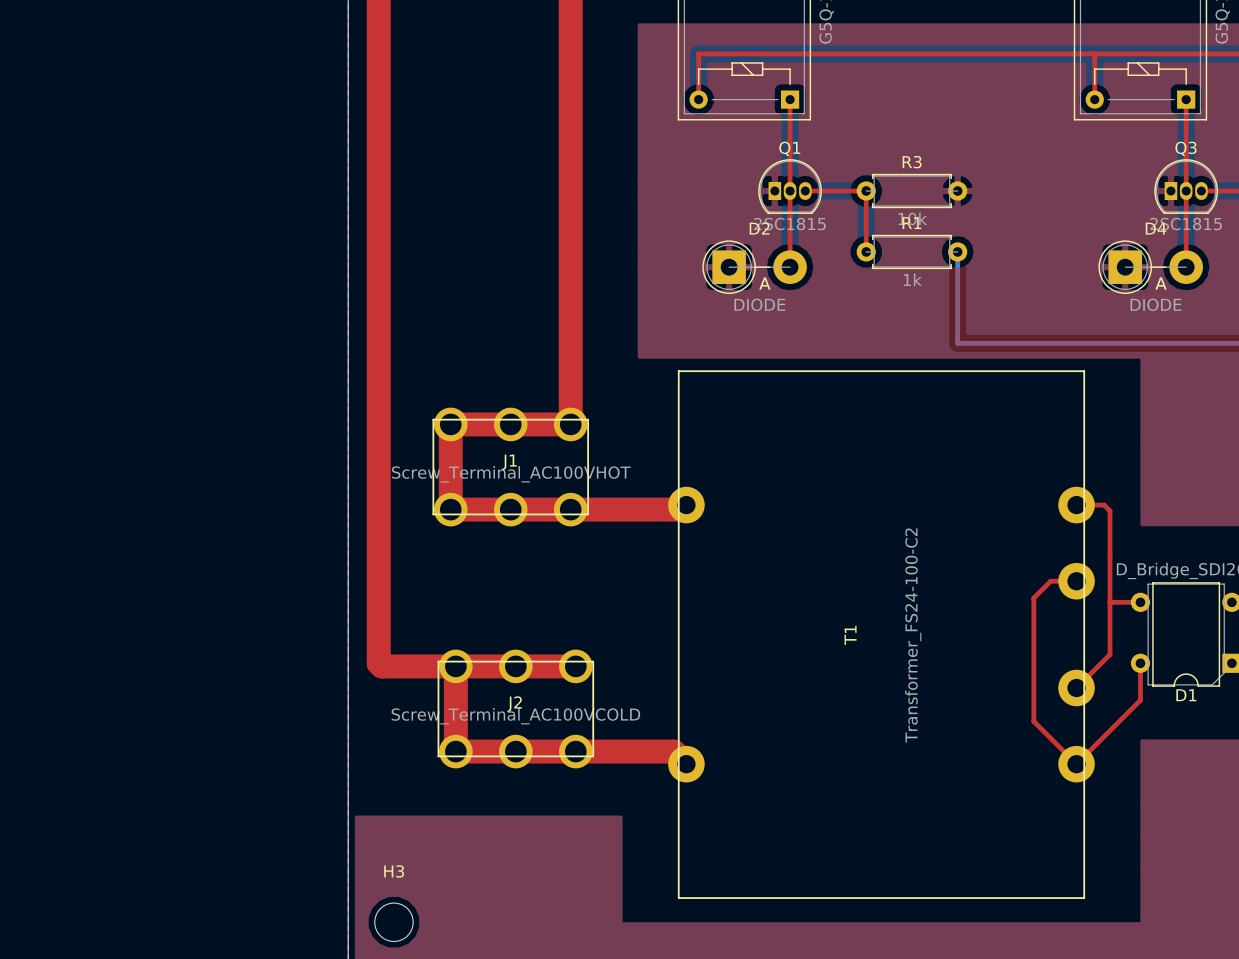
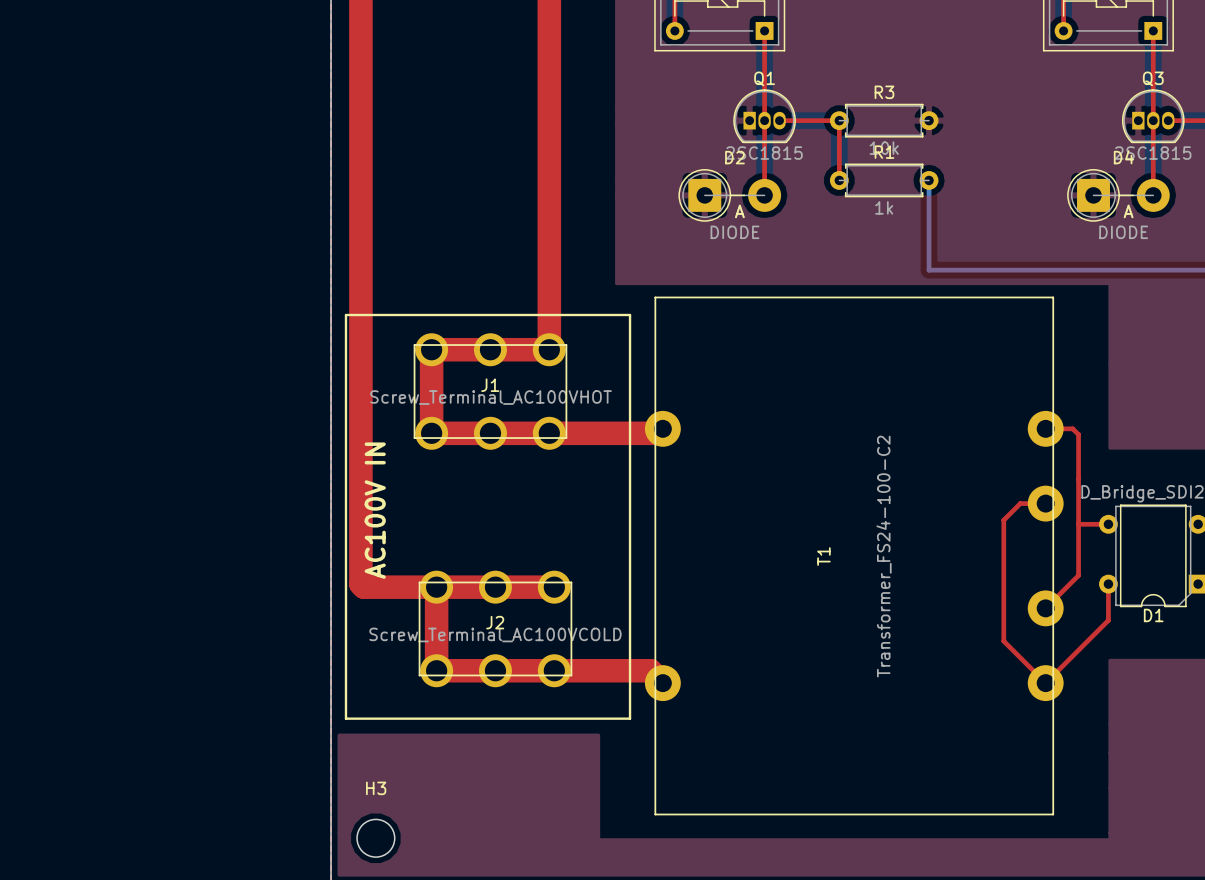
line: none -> (345, 315) (345, 718) (630, 718) (630, 315) (345, 315)
text: none -> AC100V IN (375, 510)

